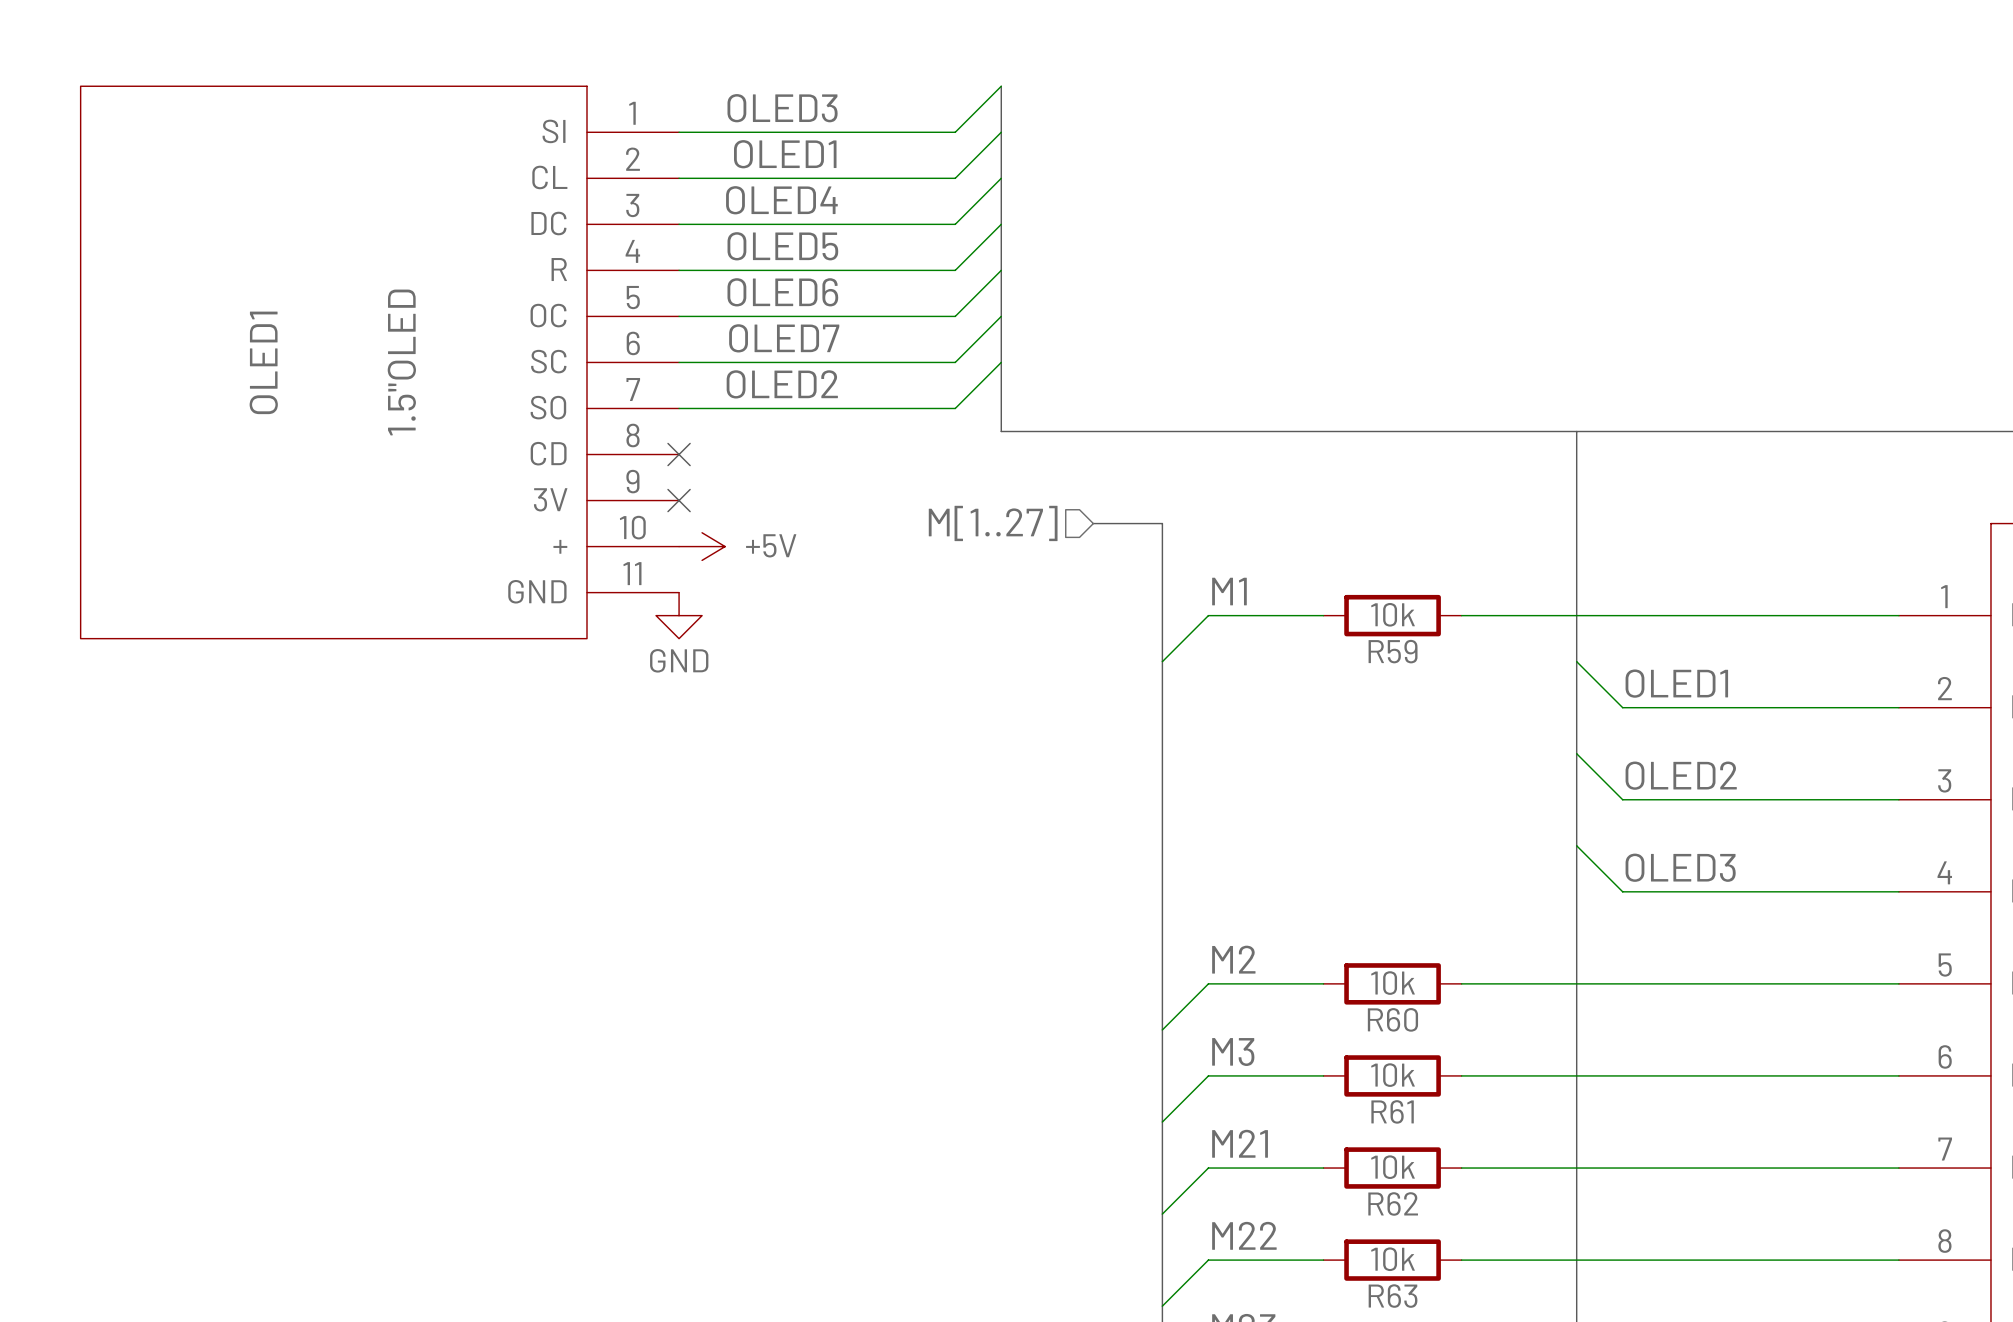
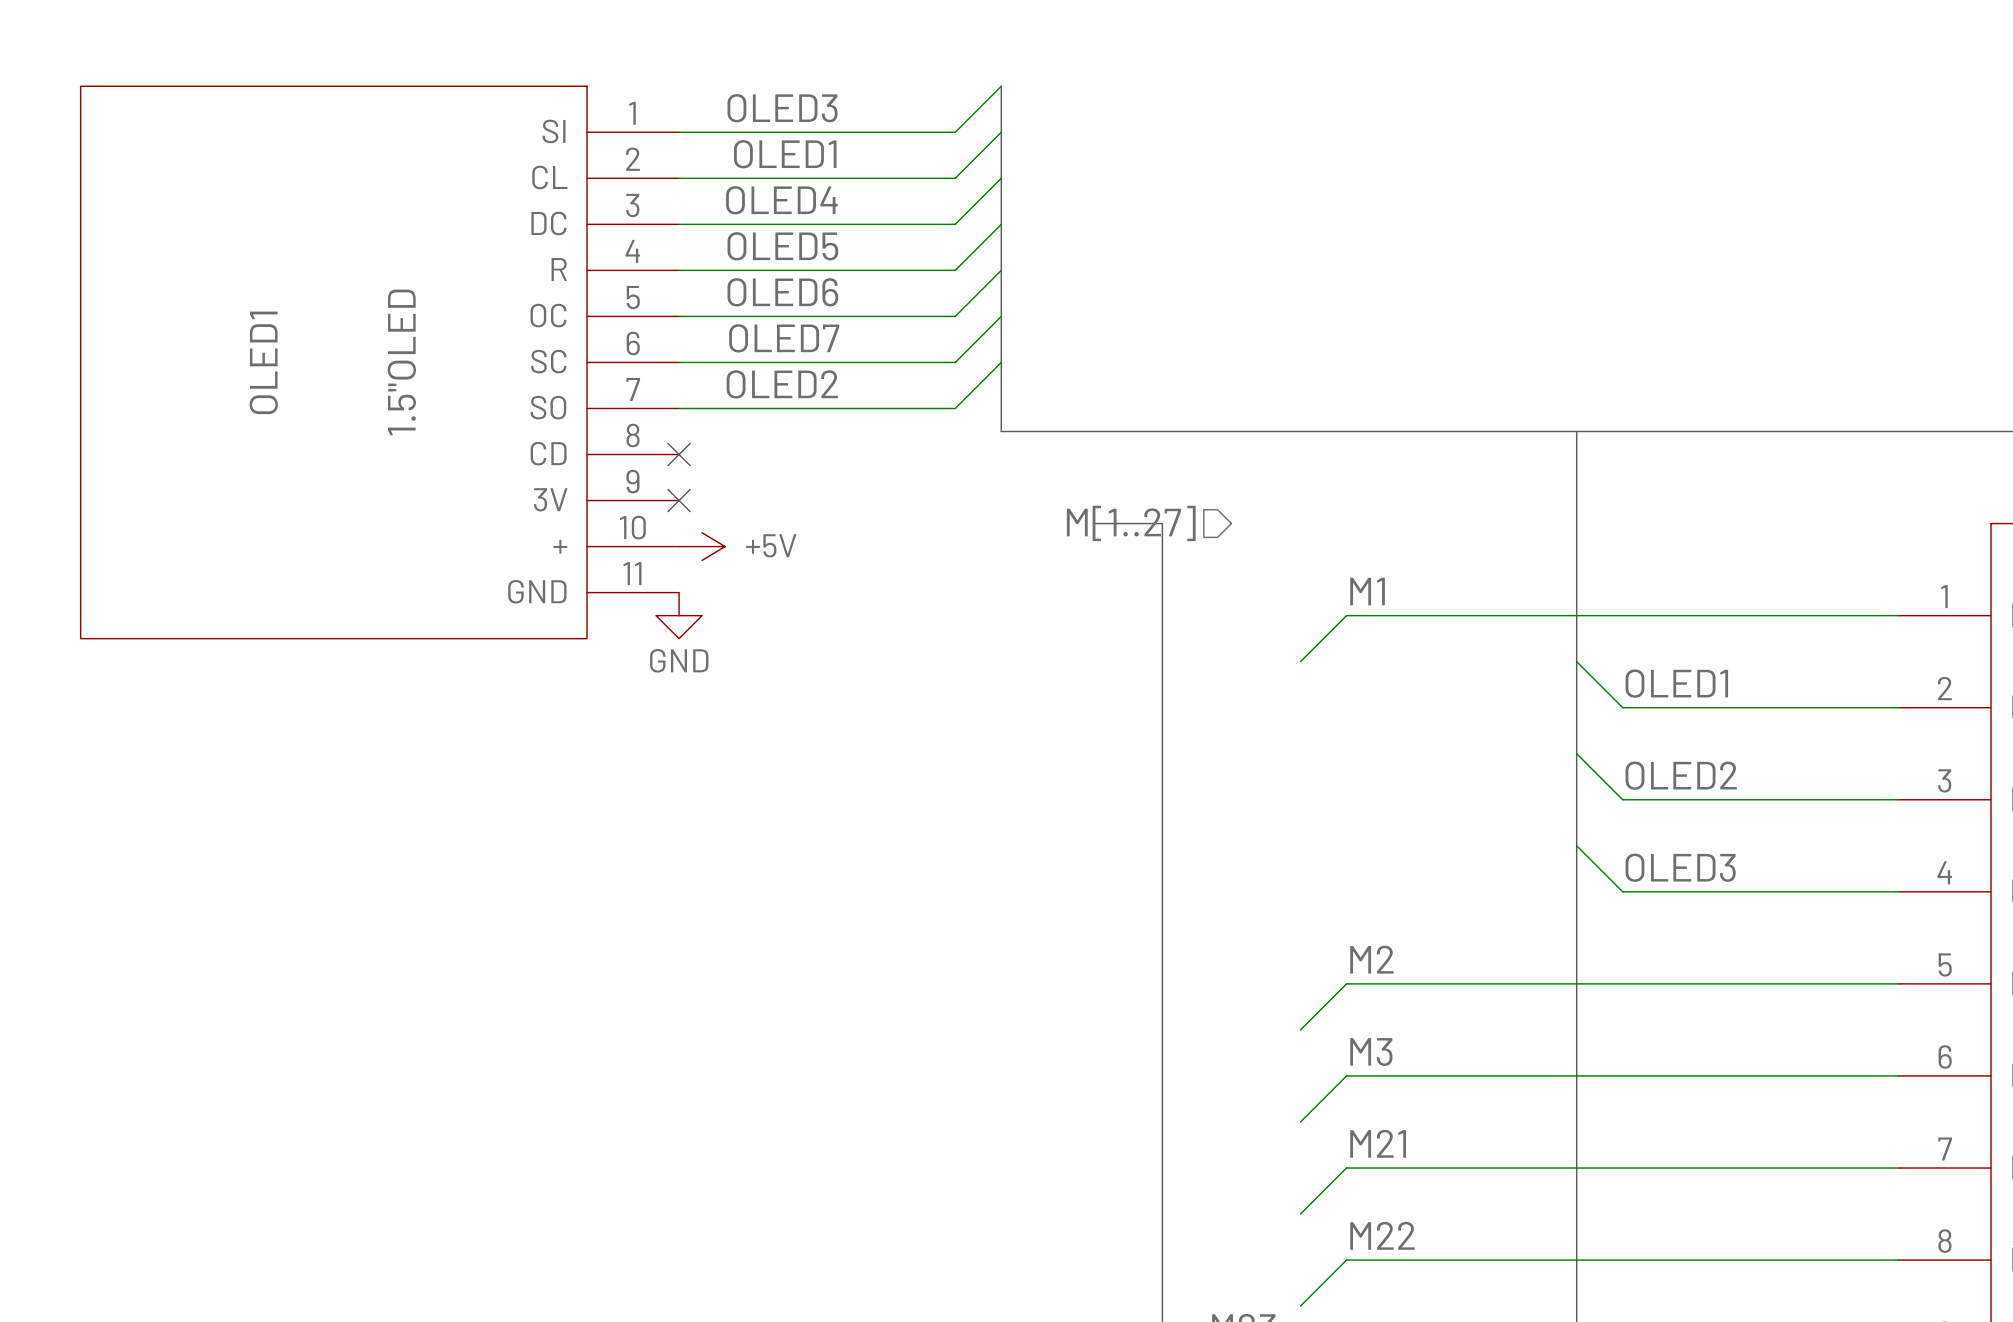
hierarchical label position: M[1..27] (993, 523) -> M[1..27] (1131, 523)
label position: M1 (1229, 591) -> M1 (1367, 591)
wire: (1323, 615) (1208, 615) (1162, 661) -> (1461, 615) (1346, 615) (1300, 661)
R59: 10k (1392, 615) -> none
label position: M2 (1233, 959) -> M2 (1371, 959)
wire: (1323, 983) (1208, 983) (1162, 1029) -> (1461, 983) (1346, 983) (1300, 1029)
R60: 10k (1392, 983) -> none
label position: M3 (1233, 1052) -> M3 (1371, 1052)
wire: (1323, 1075) (1208, 1075) (1162, 1121) -> (1461, 1075) (1346, 1075) (1300, 1121)
R61: 10k (1392, 1075) -> none
label position: M21 (1240, 1143) -> M21 (1378, 1143)
wire: (1323, 1168) (1208, 1168) (1162, 1214) -> (1461, 1168) (1346, 1168) (1300, 1214)
R62: 10k (1392, 1168) -> none
label position: M22 (1244, 1235) -> M22 (1382, 1235)
wire: (1323, 1260) (1208, 1260) (1162, 1306) -> (1461, 1260) (1346, 1260) (1300, 1306)
R63: 10k (1392, 1260) -> none

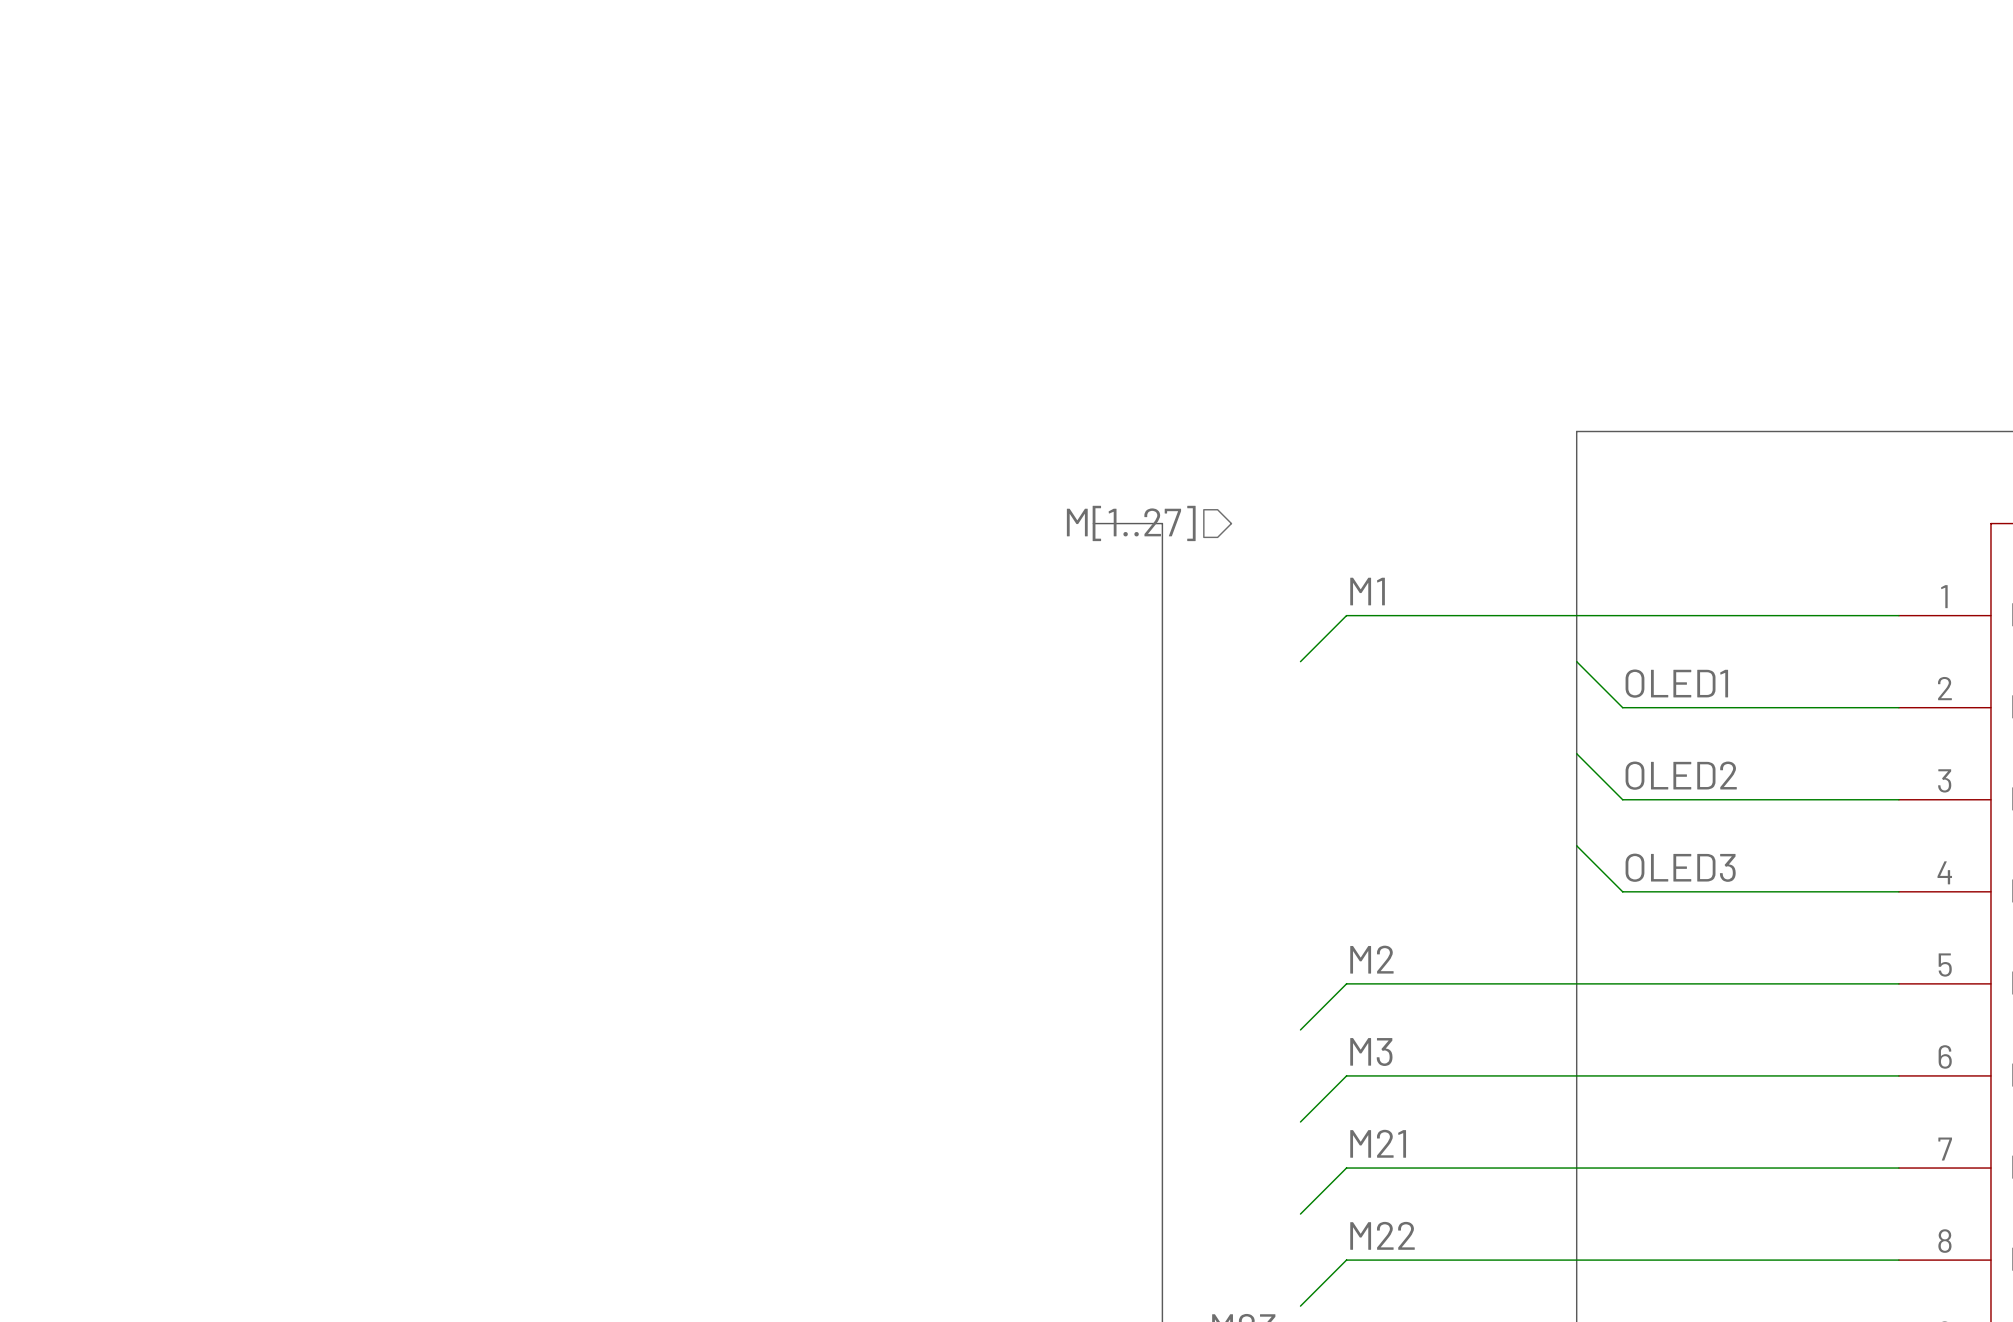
wire: (1001, 86) (955, 132) (679, 132) -> none
bus: (1001, 86) (1001, 431) (1576, 431) -> none
label: OLED3 (782, 108) -> none
wire: (1001, 132) (955, 178) (679, 178) -> none
label: OLED1 (785, 154) -> none
wire: (1001, 178) (955, 224) (679, 224) -> none
label: OLED4 (781, 200) -> none
wire: (1001, 224) (955, 270) (679, 270) -> none
label: OLED5 (782, 246) -> none
wire: (1001, 270) (955, 316) (679, 316) -> none
label: OLED6 (782, 292) -> none
wire: (1001, 316) (955, 362) (679, 362) -> none
label: OLED7 (784, 338) -> none
OLED1: 1.5"OLED (379, 362) -> none
wire: (1001, 362) (955, 408) (679, 408) -> none
label: OLED2 (782, 384) -> none
no-connect mark: (679, 454) -> none
no-connect mark: (679, 500) -> none
power symbol: +5V (702, 546) -> none
power symbol: GND (679, 615) -> none

